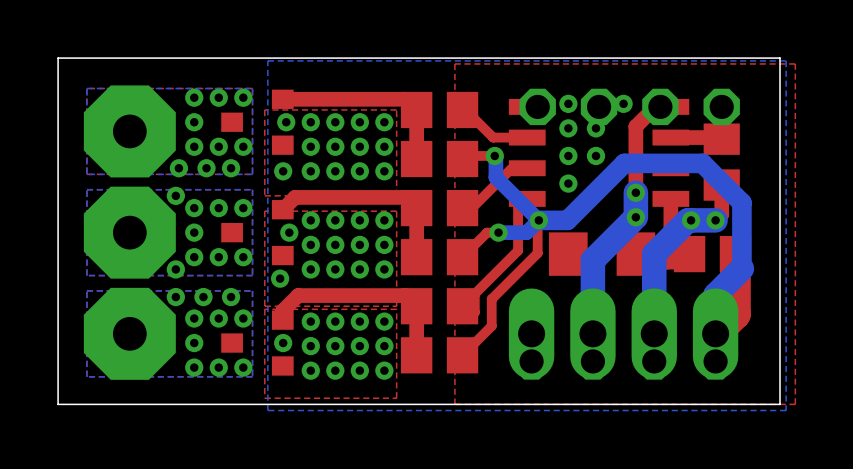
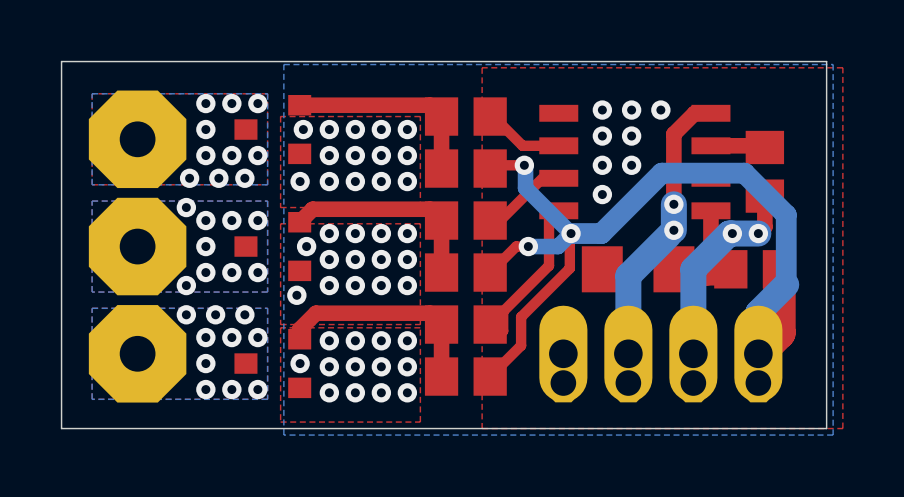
part: (629, 106) -> none

